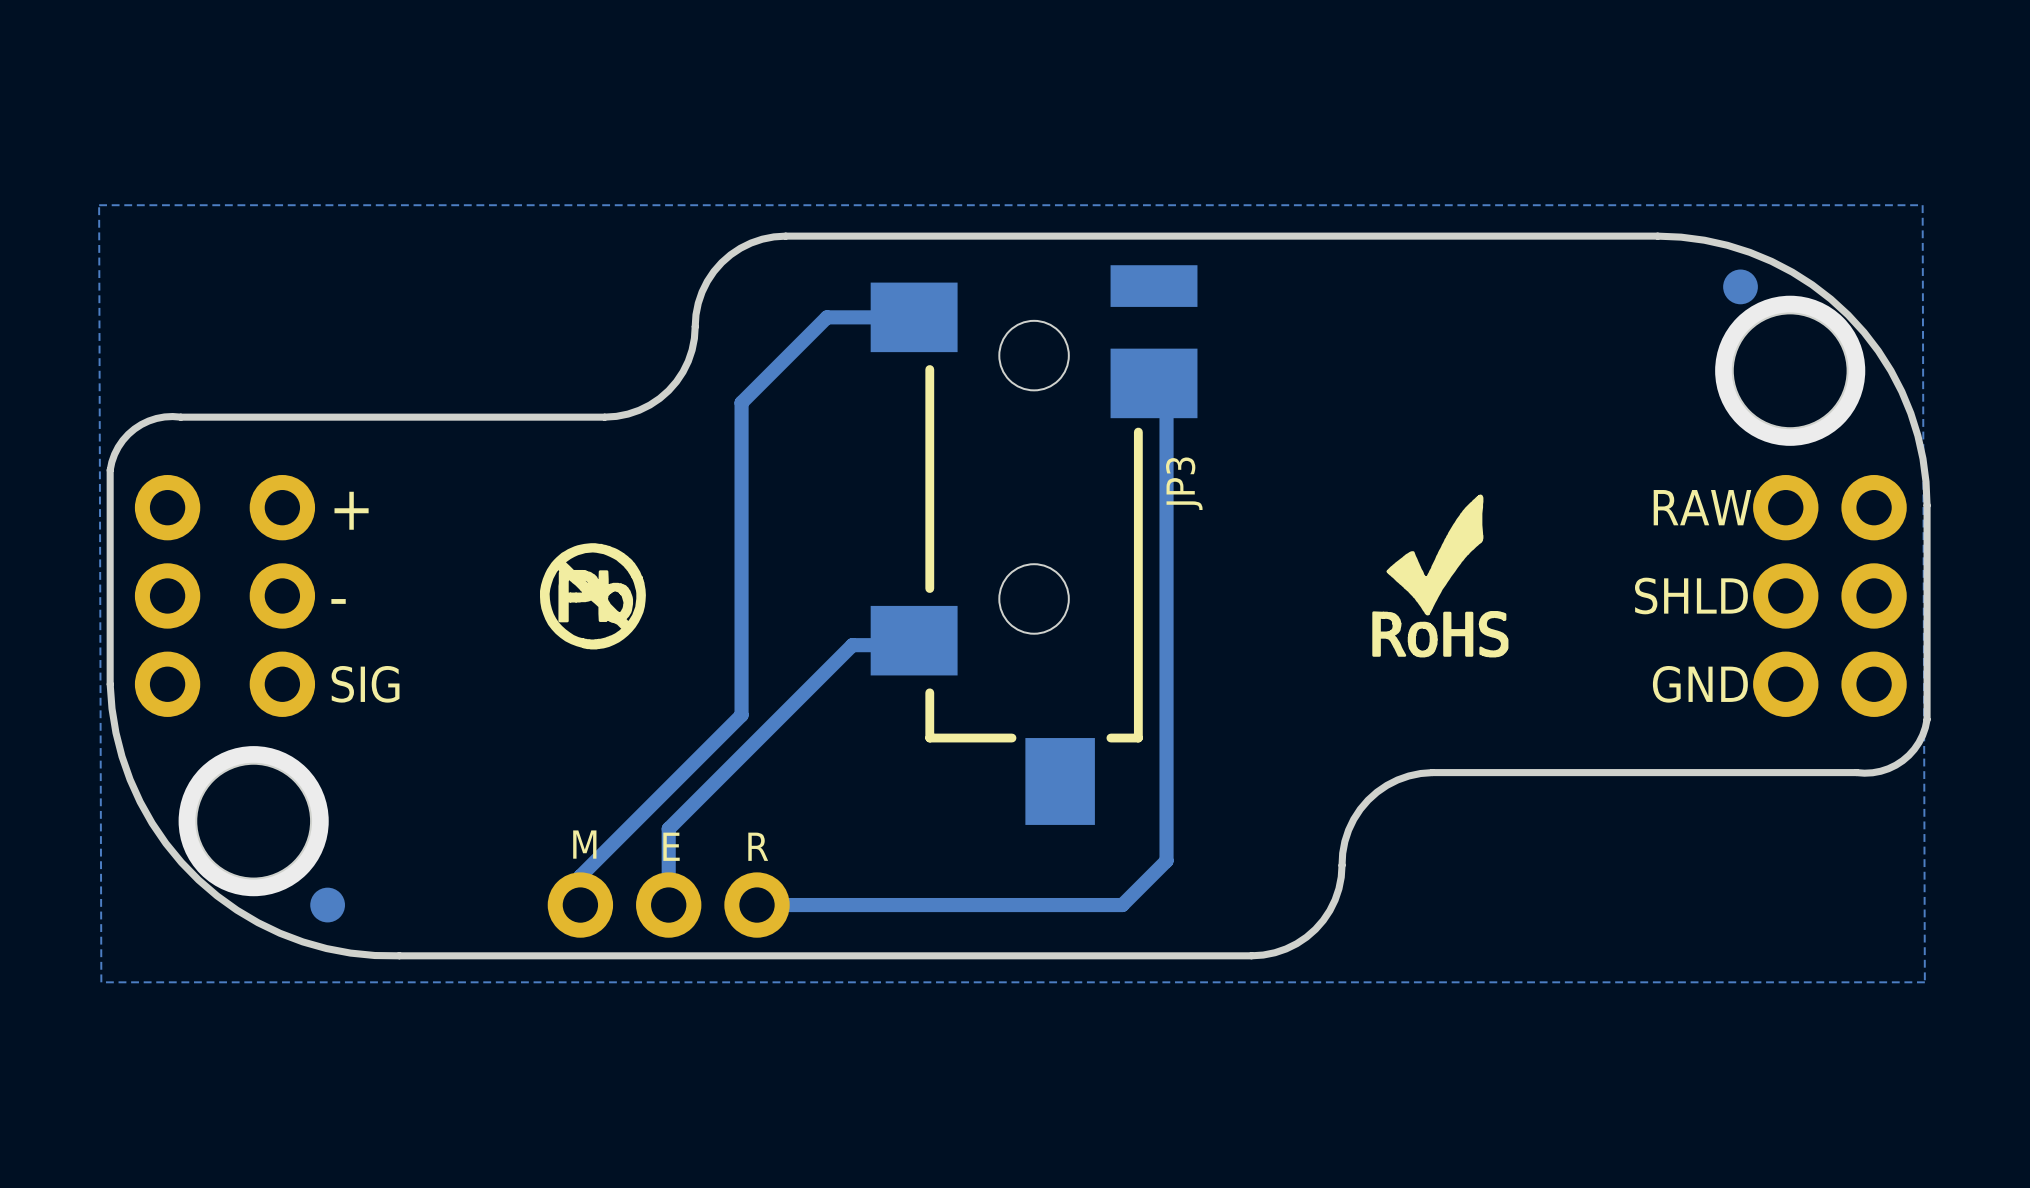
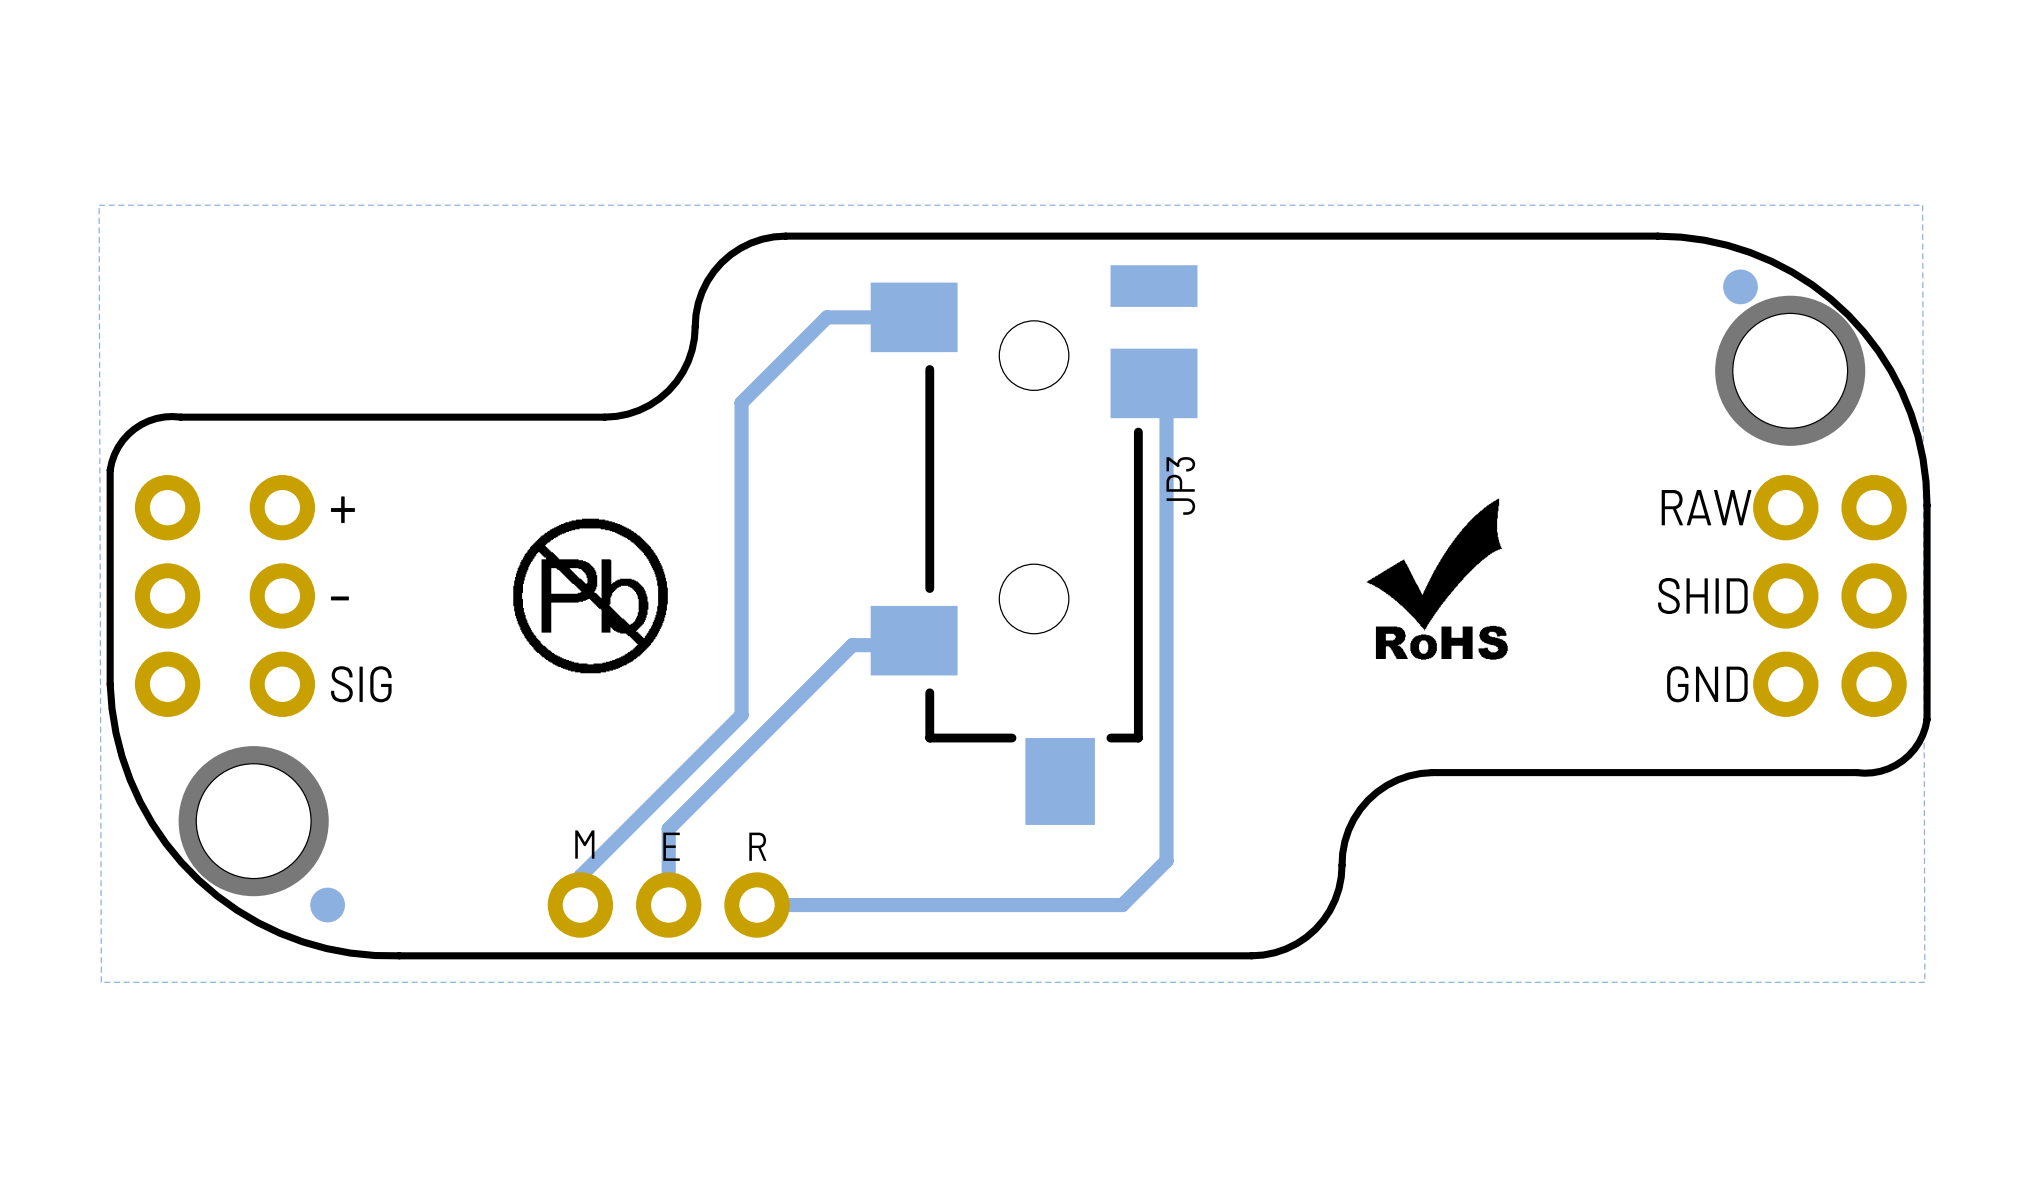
drawing shape: [1372, 494, 1509, 658] -> [1366, 498, 1508, 660]
drawing shape: [540, 543, 646, 650] -> [513, 518, 668, 674]
text: SHLD (1691, 596) -> SHlD (1702, 595)

